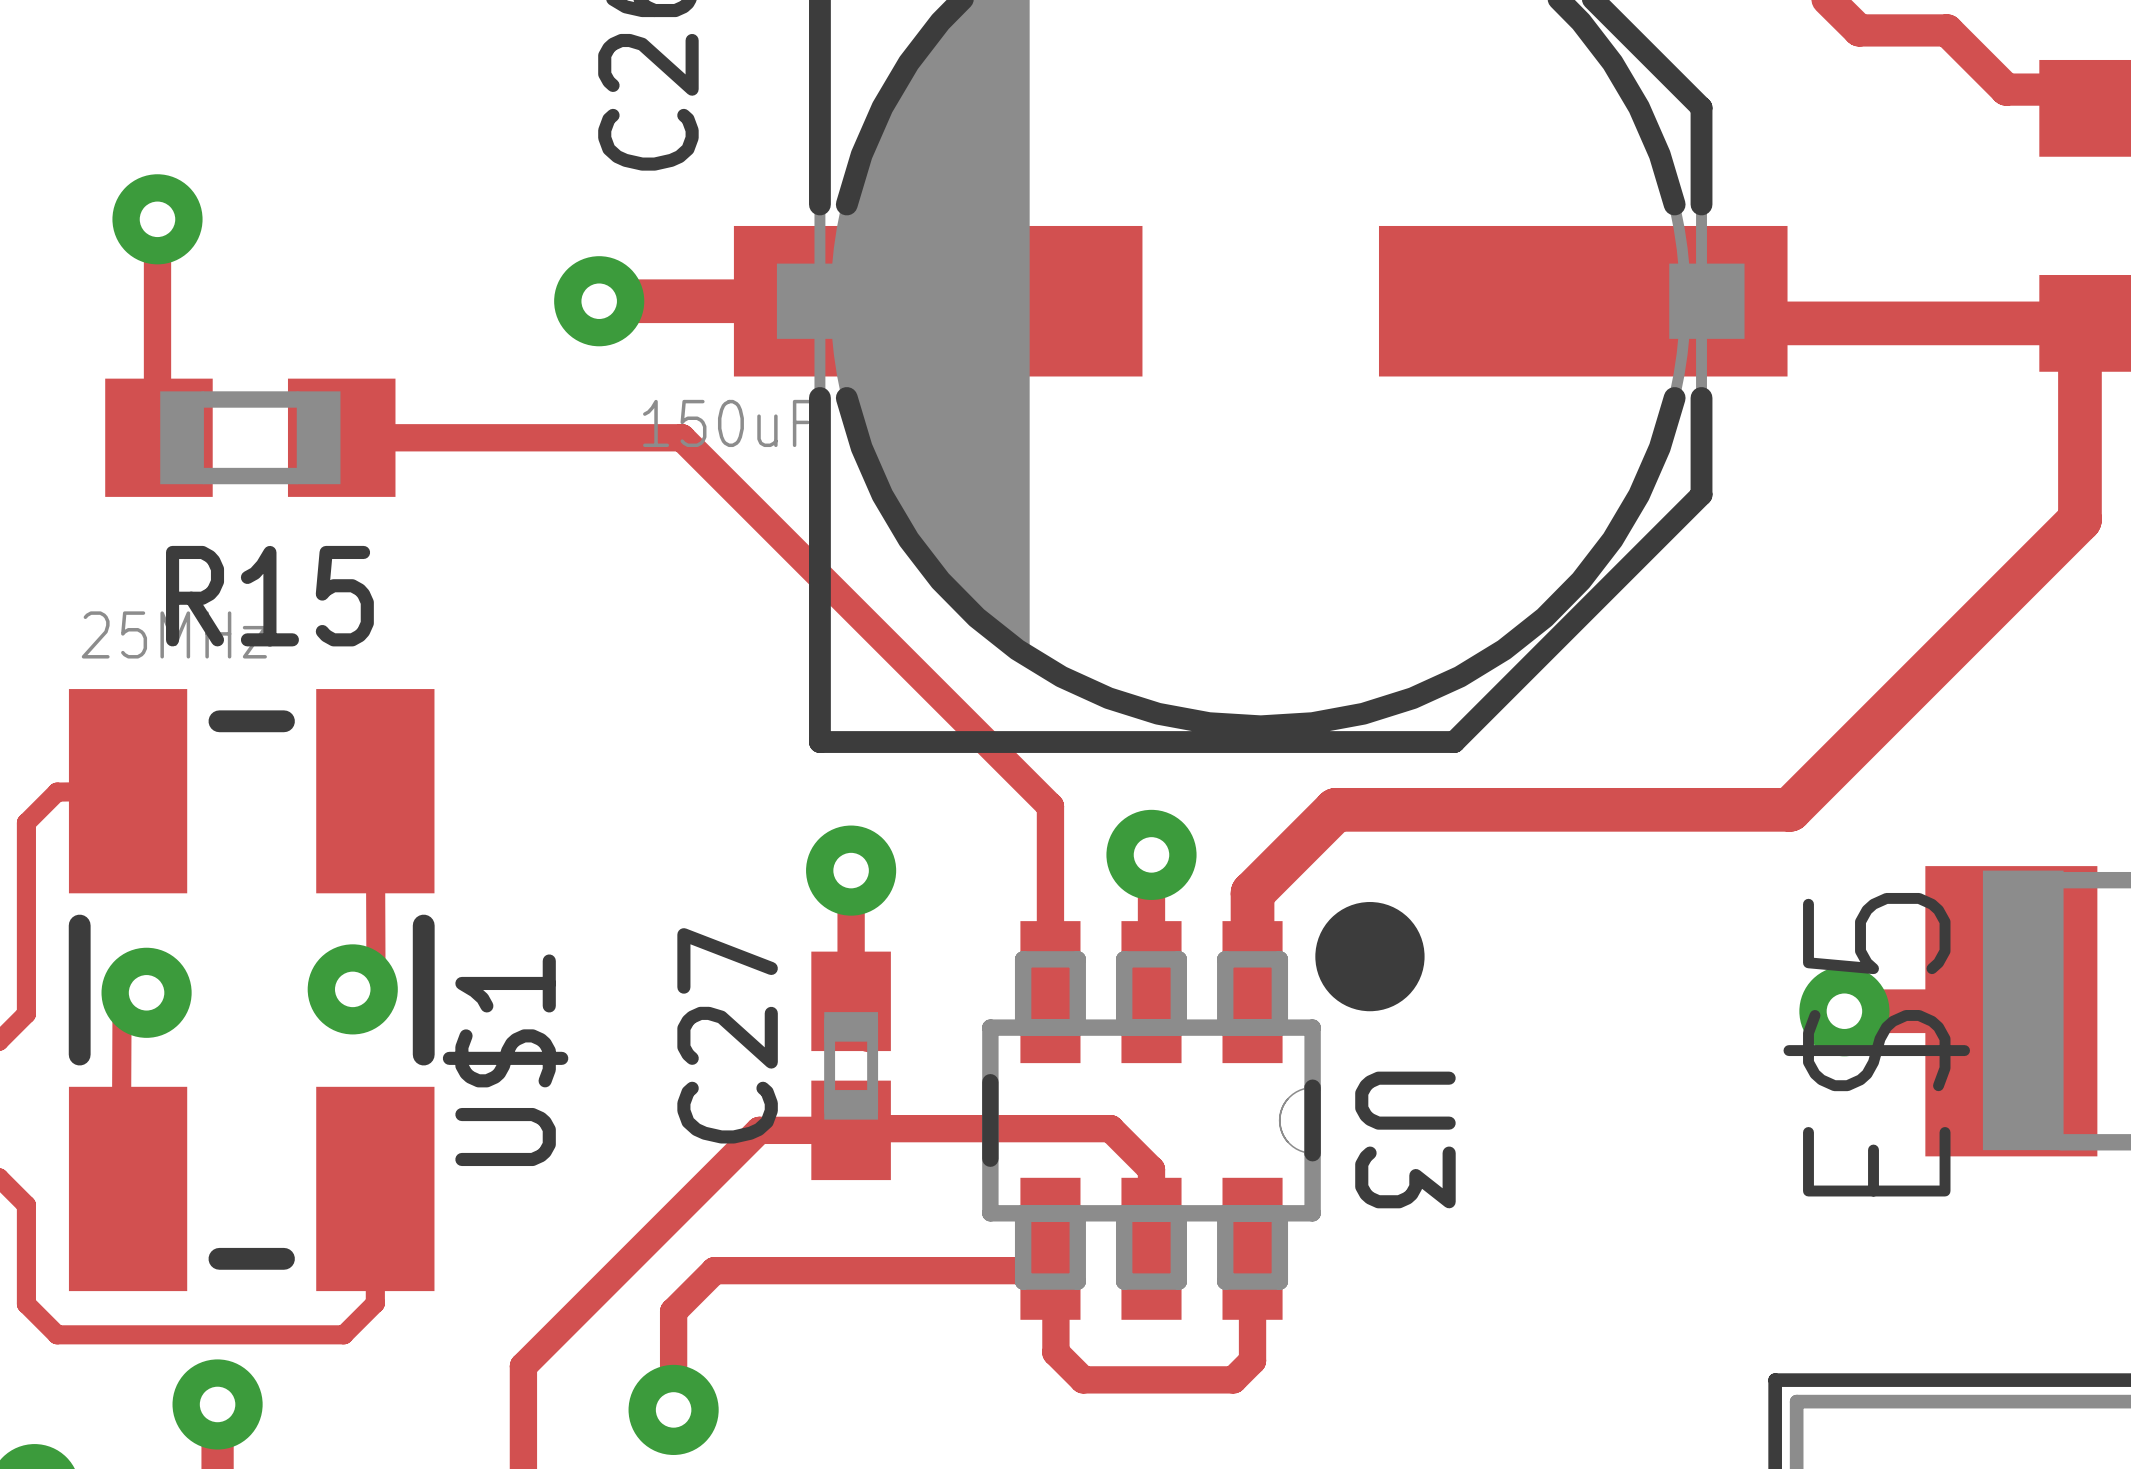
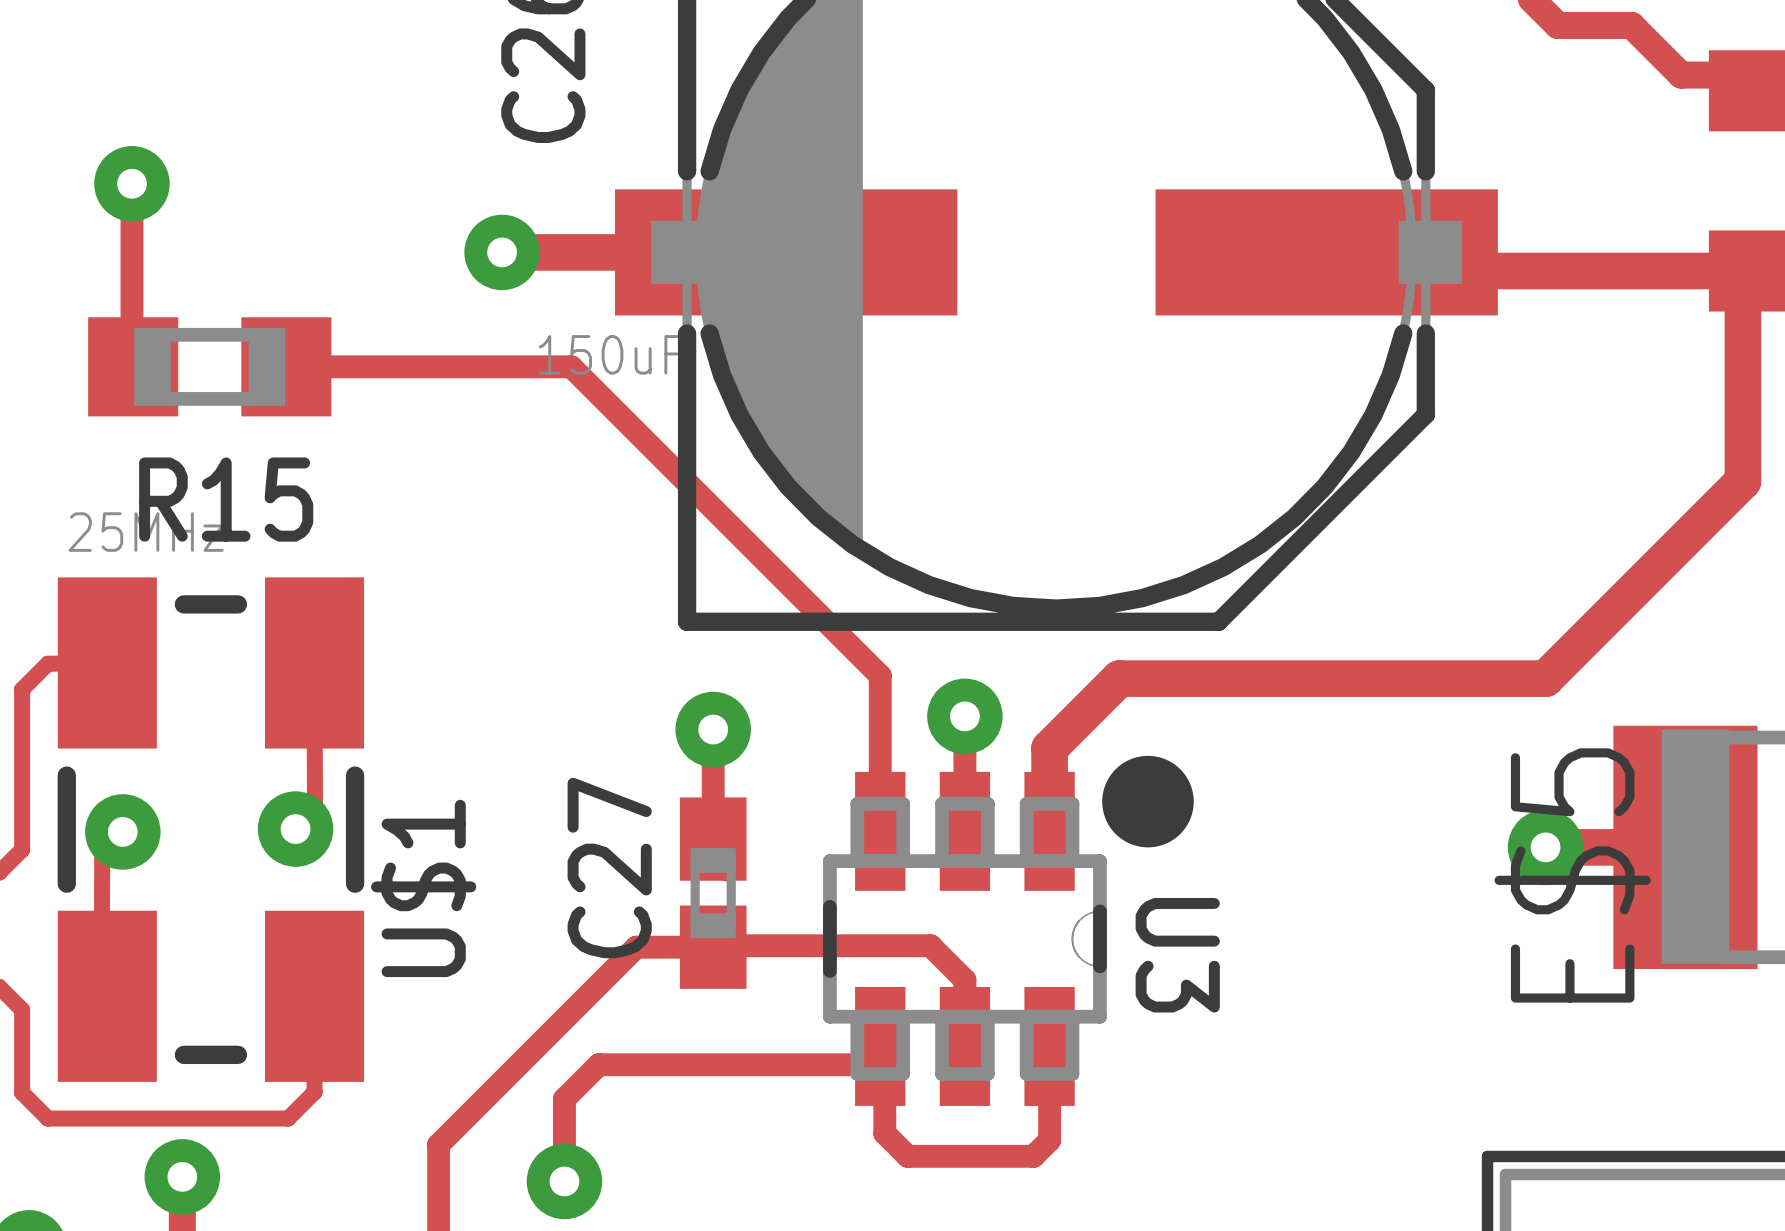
track: (2079, 519) (1789, 809) -> (1742, 435) (1742, 481) (1545, 678) (1499, 678)

